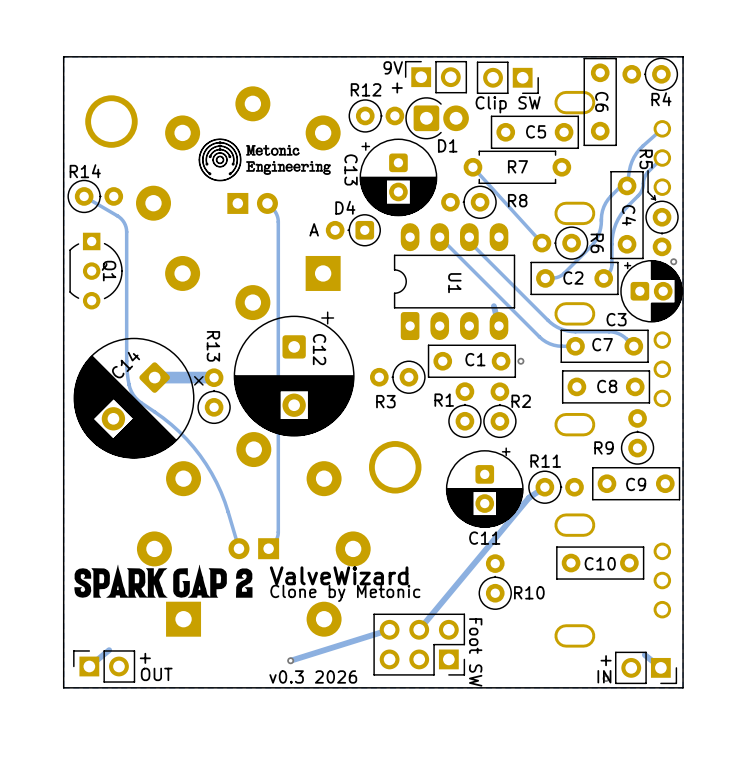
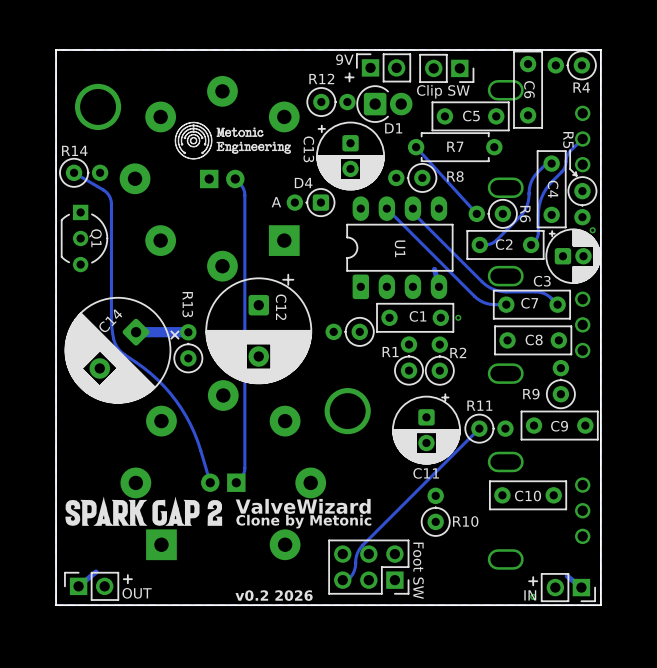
track: (662, 128) (639, 149) (634, 157) (627, 185) -> none
R3 name: R3 (385, 401) -> none
track: (544, 487) (529, 497) (419, 629) -> (479, 428) (360, 547) (356, 556) (353, 573) (342, 585)
track: (389, 629) (290, 660) -> none
via: (290, 660) -> none
text: v0.3 2026 (313, 676) -> v0.2 2026 (274, 595)

